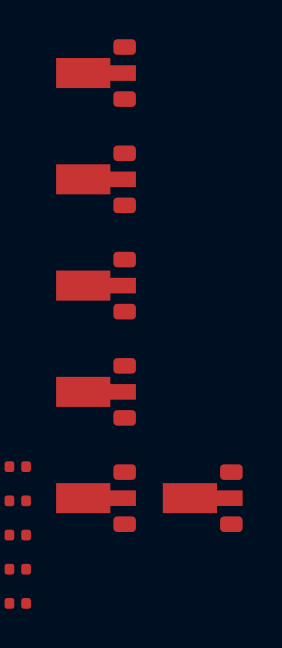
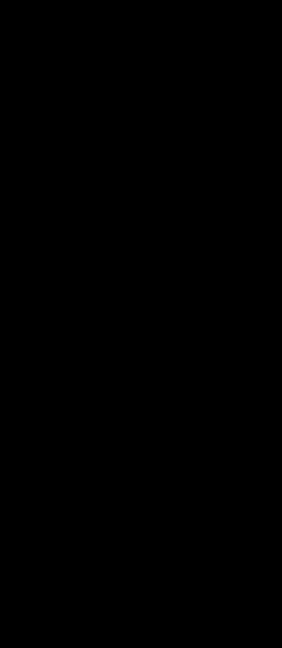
part: (96, 73) -> none
part: (96, 179) -> none
part: (96, 285) -> none
part: (96, 391) -> none
part: (17, 466) -> none
part: (96, 498) -> none
part: (202, 498) -> none
part: (17, 500) -> none
part: (17, 535) -> none
part: (17, 569) -> none
part: (17, 603) -> none

